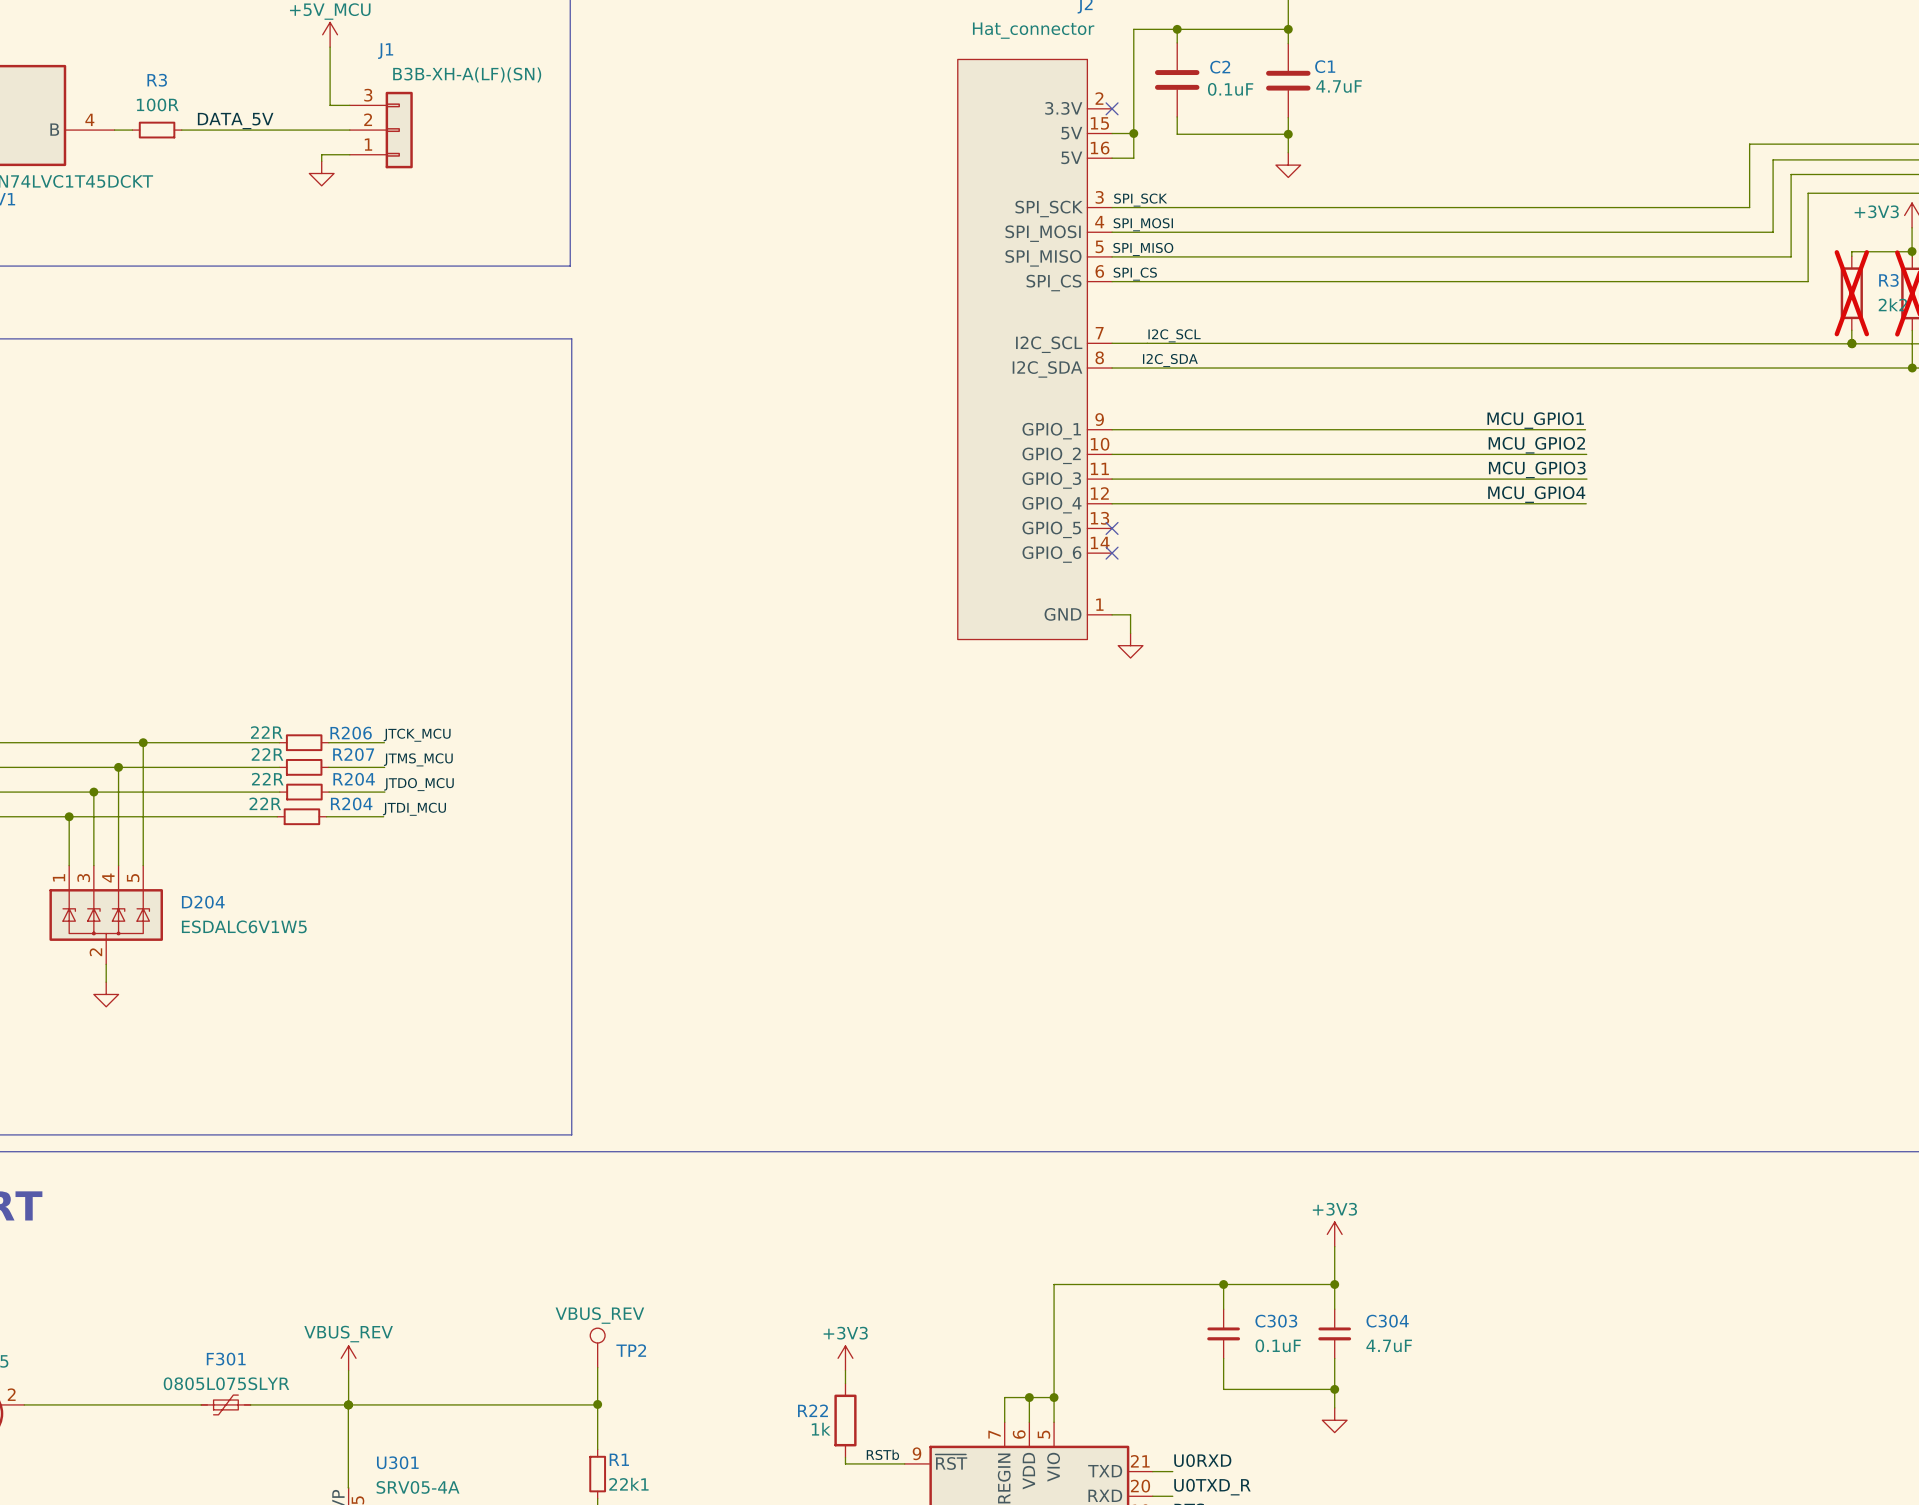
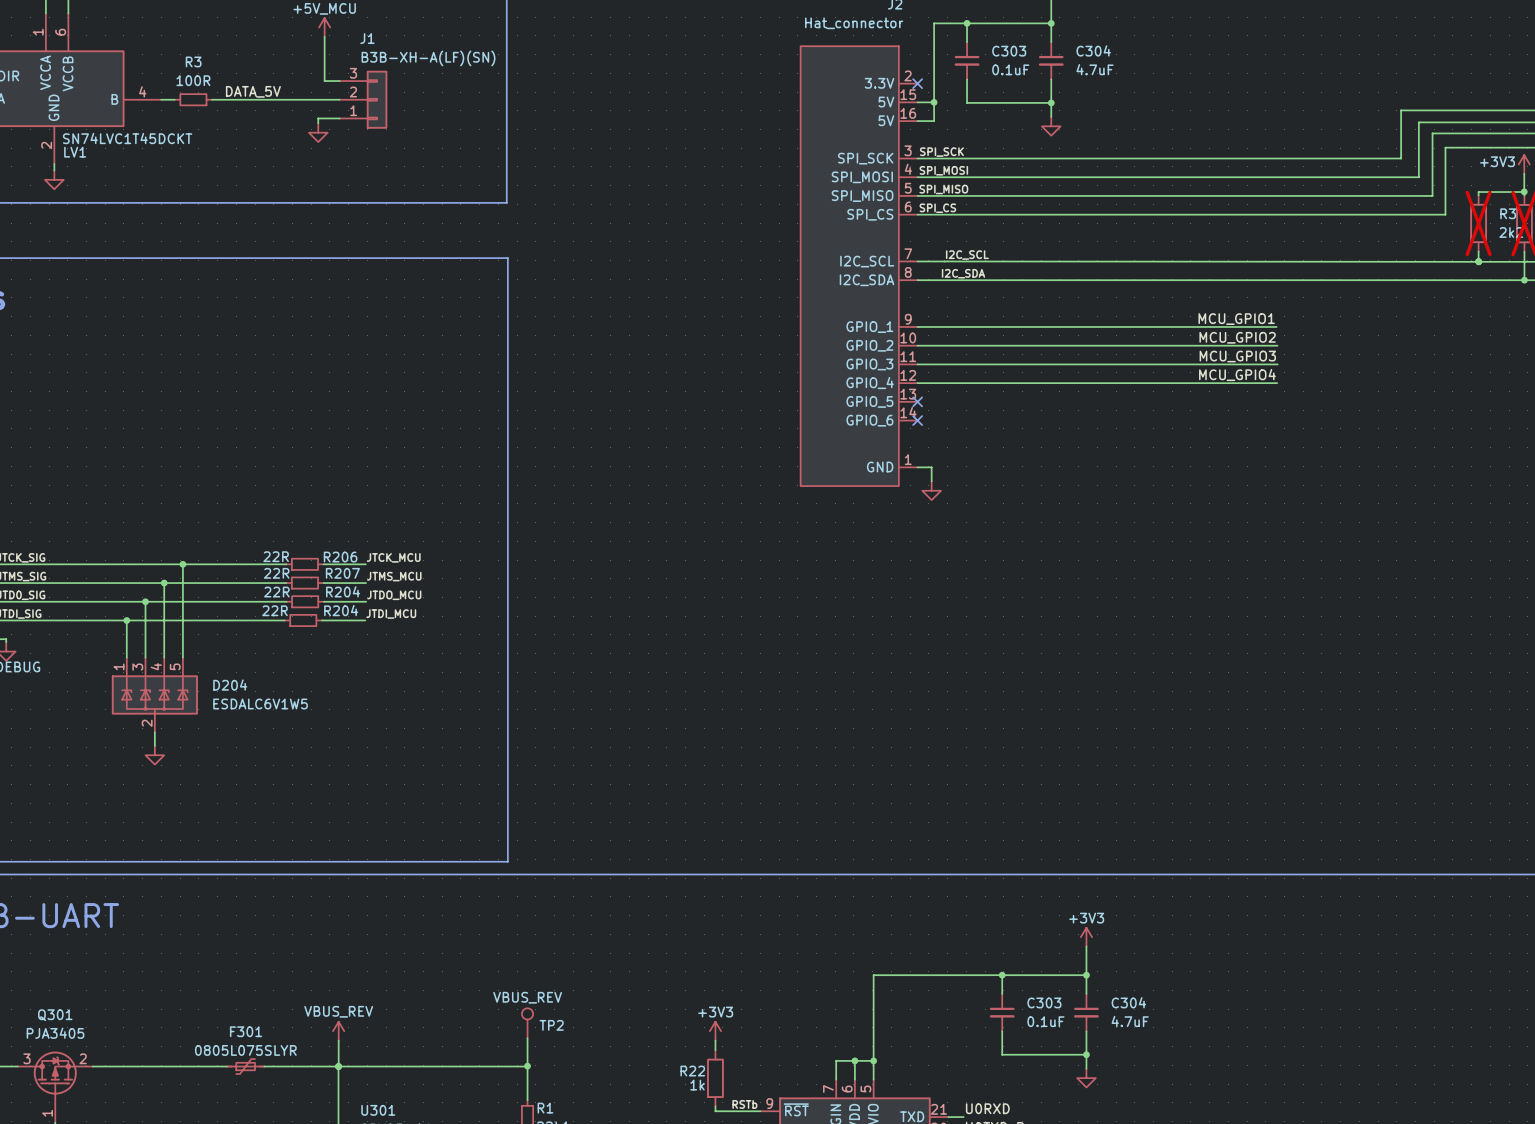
C303: none -> 0.1uF (967, 60)
C304: none -> 4.7uF (1051, 60)
C2: 0.1uF (1177, 79) -> none
C1: 4.7uF (1288, 80) -> none

